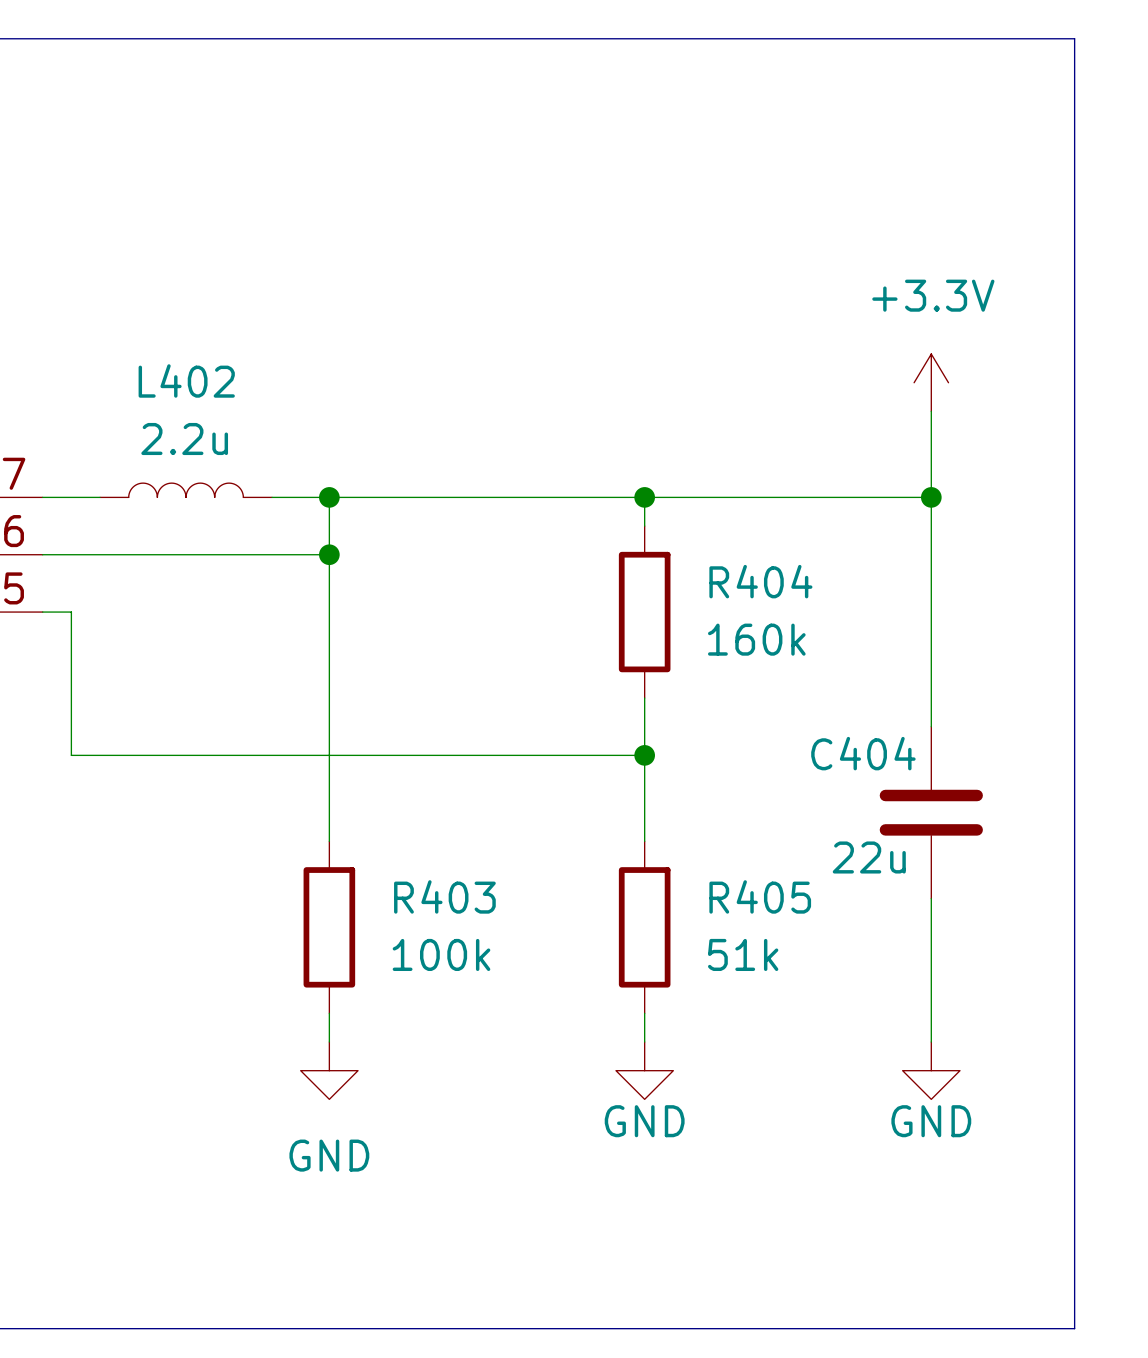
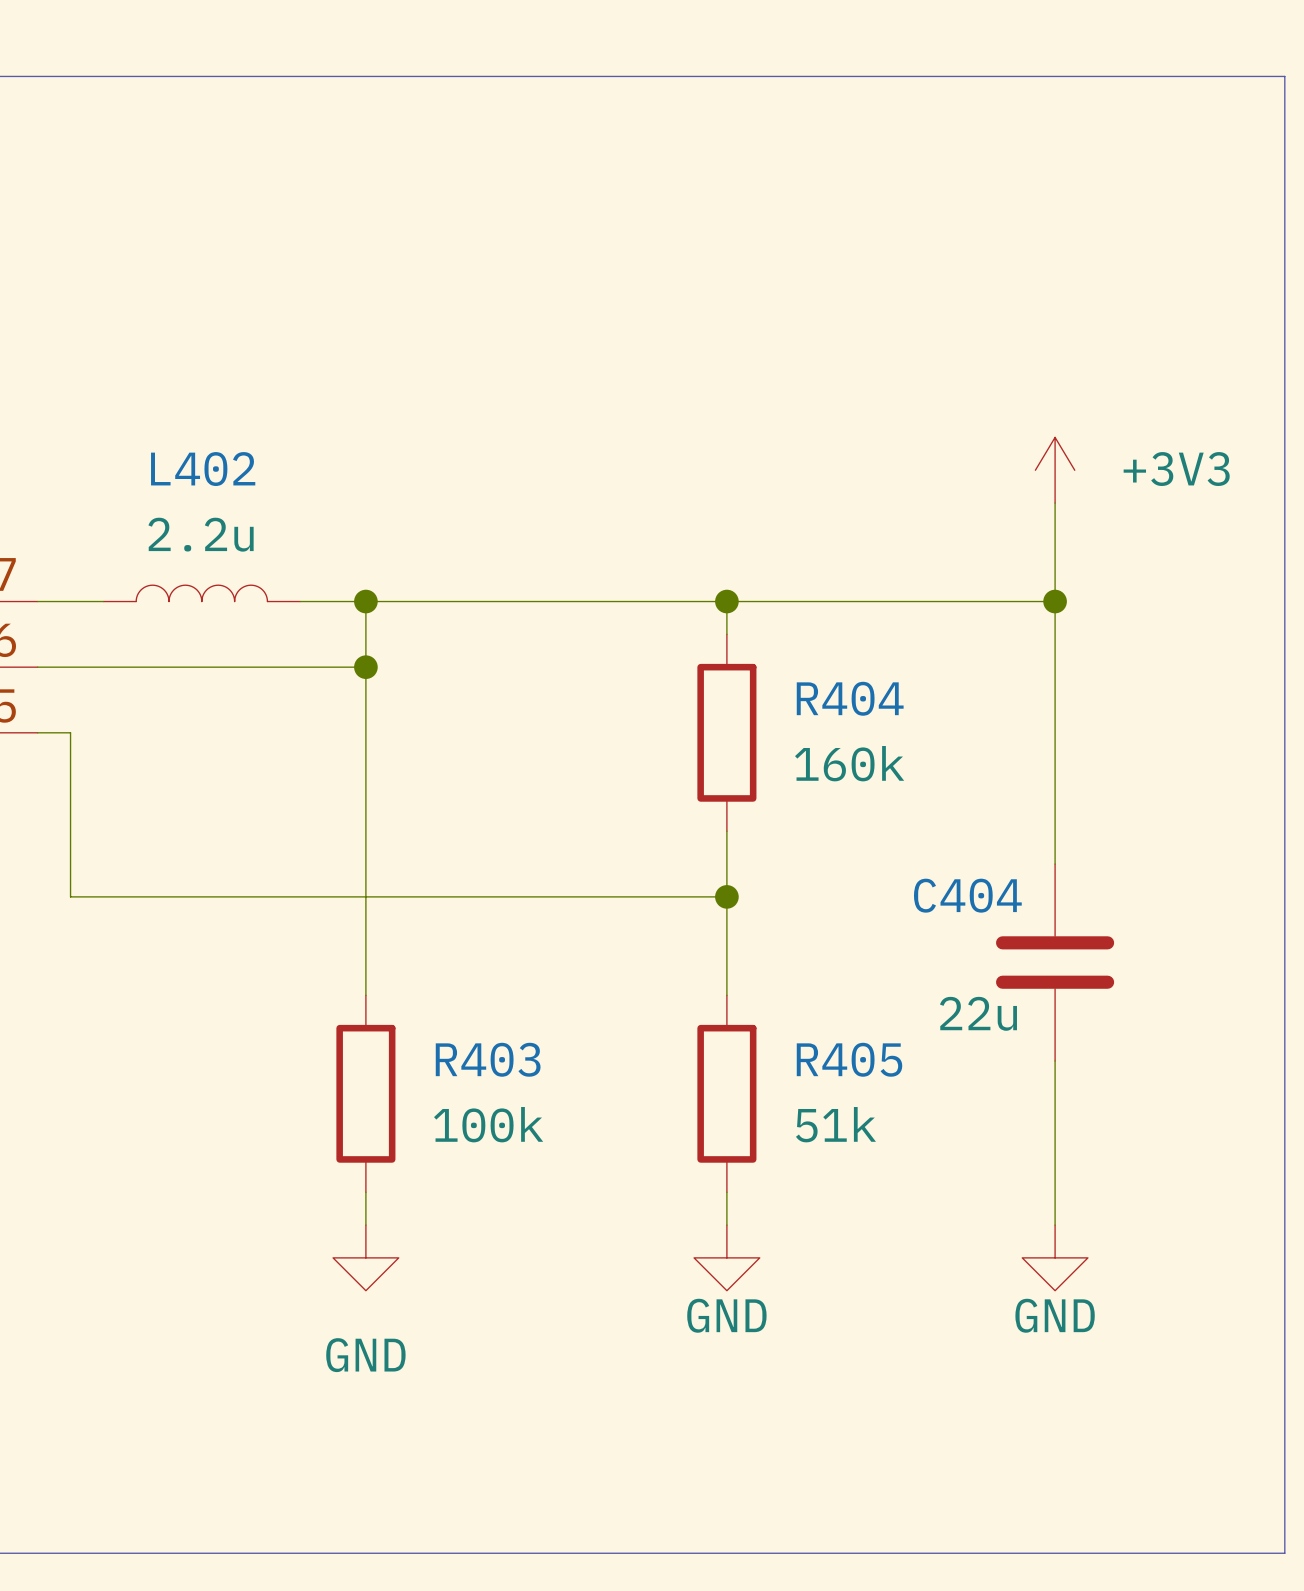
line: (1074, 38) (1074, 1328) -> (1219, 76) (1284, 76) (1284, 1553) (1219, 1553)
power symbol: +3.3V (931, 382) -> +3V3 (1055, 470)

